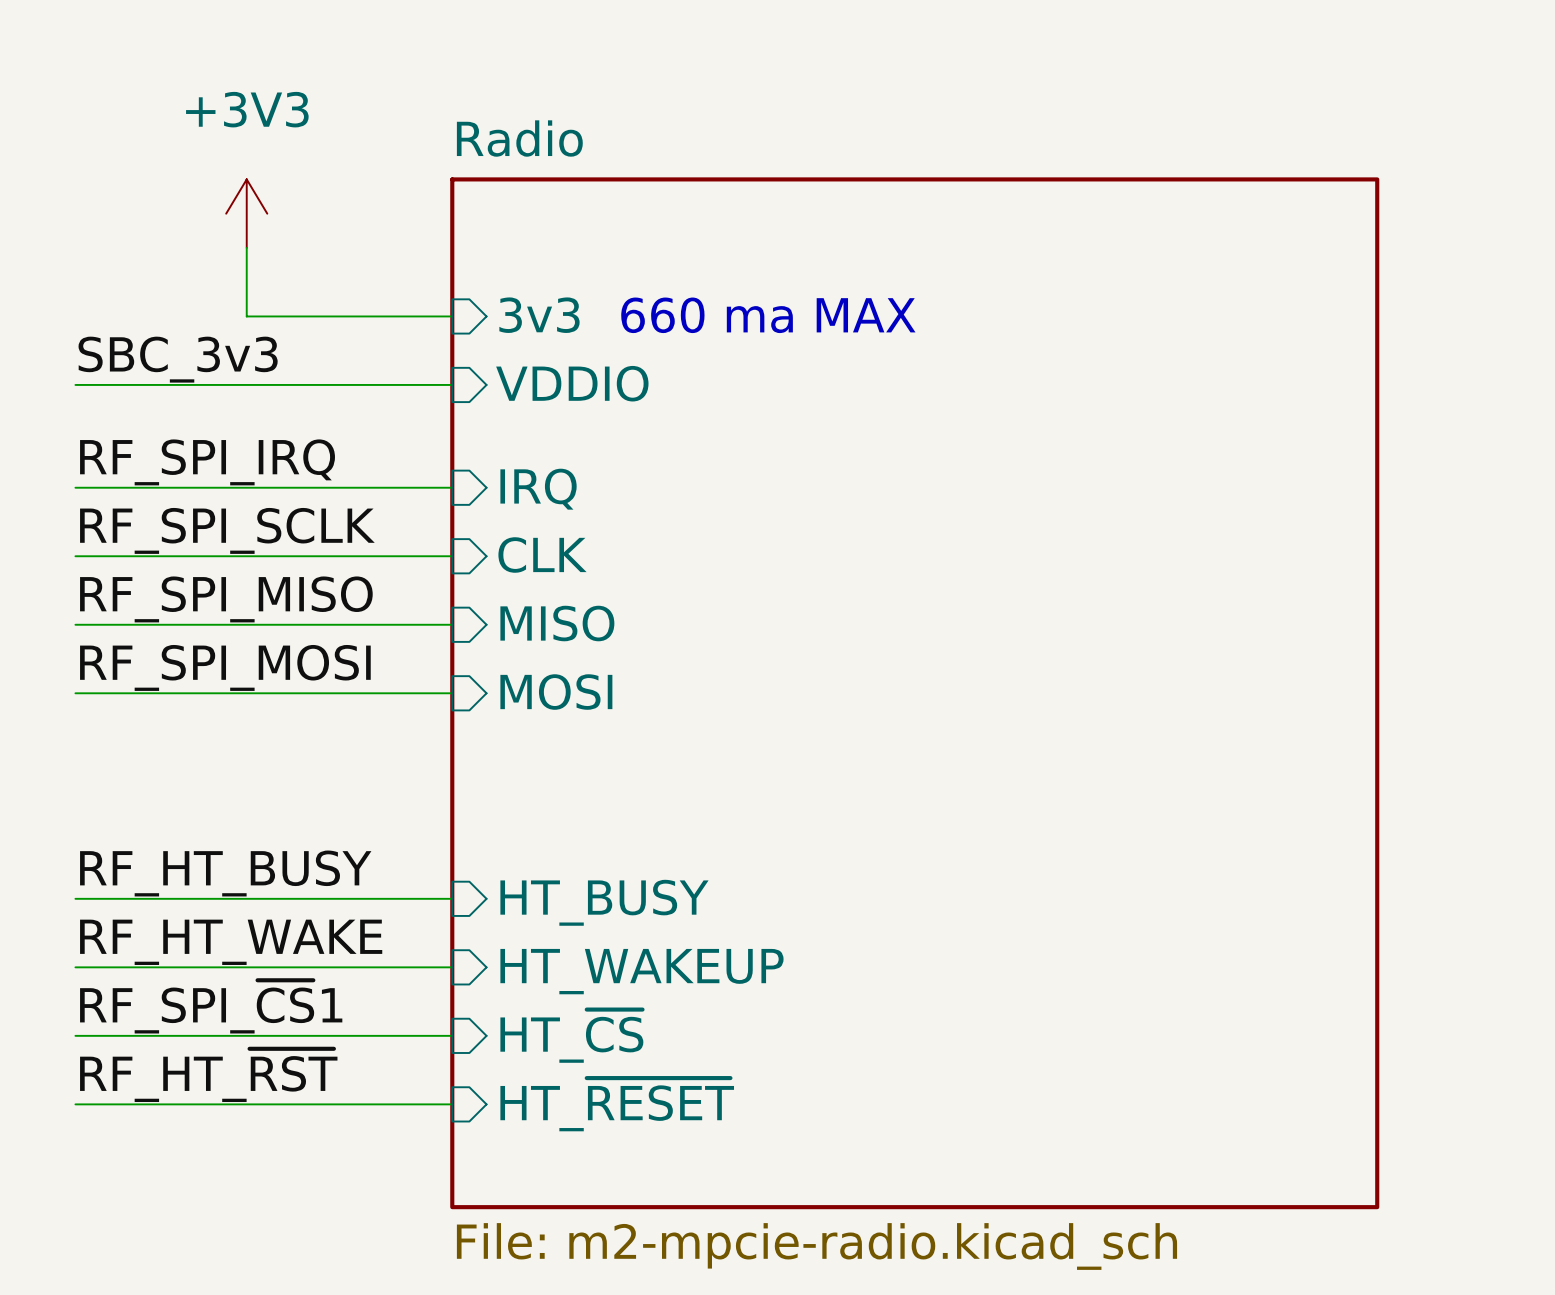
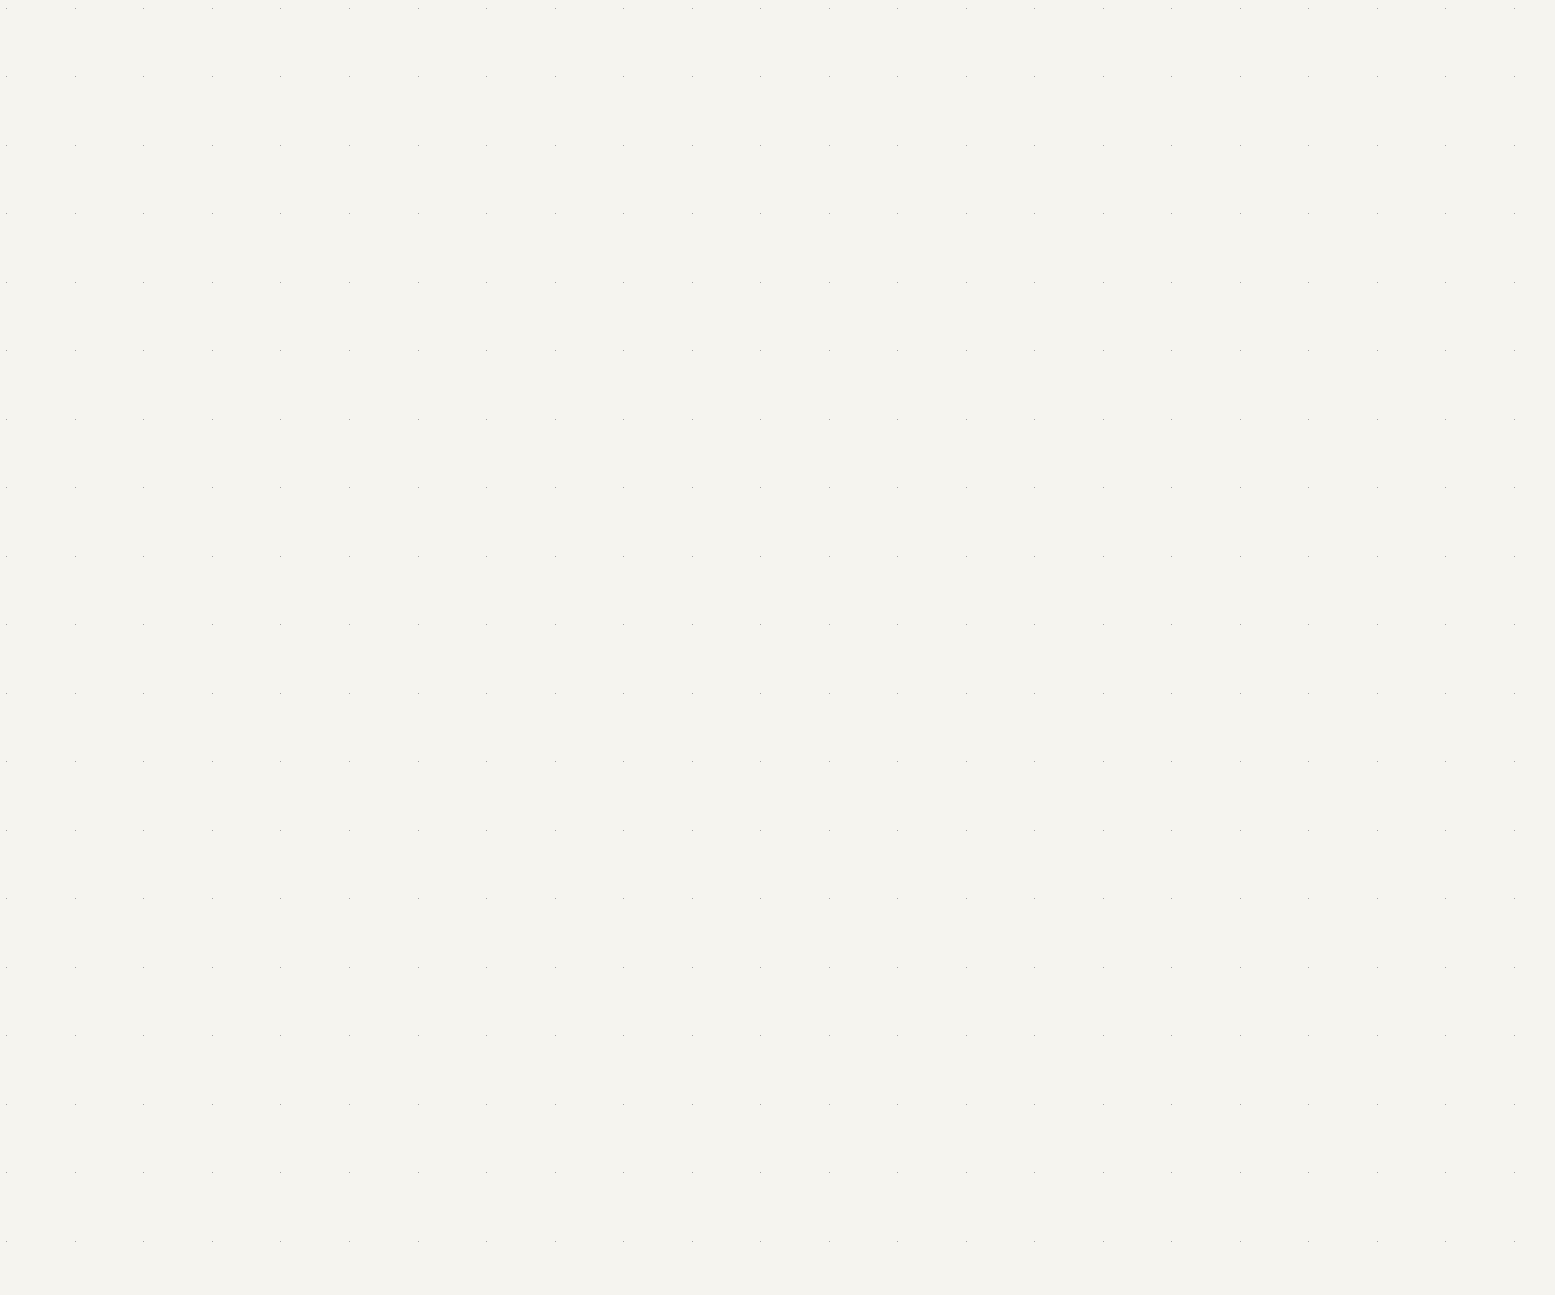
power symbol: +3V3 (246, 213) -> none
wire: (246, 247) (246, 316) (452, 316) -> none
sheet pin: 3v3 (539, 315) -> none
text: 660 ma MAX (768, 315) -> none
label: SBC_3v3 (178, 359) -> none
sheet pin: VDDIO (572, 383) -> none
wire: (75, 384) (452, 384) -> none
label: RF_SPI_IRQ (207, 462) -> none
wire: (75, 487) (452, 487) -> none
sheet pin: IRQ (538, 489) -> none
label: RF_SPI_SCLK (227, 530) -> none
sheet pin: CLK (542, 555) -> none
wire: (75, 556) (452, 556) -> none
label: RF_SPI_MISO (226, 599) -> none
sheet pin: MISO (557, 623) -> none
wire: (75, 624) (452, 624) -> none
label: RF_SPI_MOSI (225, 667) -> none
sheet pin: MOSI (556, 692) -> none
wire: (75, 693) (452, 693) -> none
sheet Radio: File: m2-mpcie-radio.kicad_sch (914, 693) -> none
label: RF_HT_BUSY (225, 873) -> none
wire: (75, 898) (452, 898) -> none
sheet pin: HT_BUSY (604, 902) -> none
label: RF_HT_WAKE (231, 942) -> none
wire: (75, 967) (452, 967) -> none
sheet pin: HT_WAKEUP (641, 971) -> none
label: RF_SPI_~{CS}1 (211, 1006) -> none
wire: (75, 1035) (452, 1035) -> none
sheet pin: HT_~{CS} (571, 1036) -> none
label: RF_HT_~{RST} (208, 1075) -> none
wire: (75, 1104) (452, 1104) -> none
sheet pin: HT_~{RESET} (617, 1104) -> none

